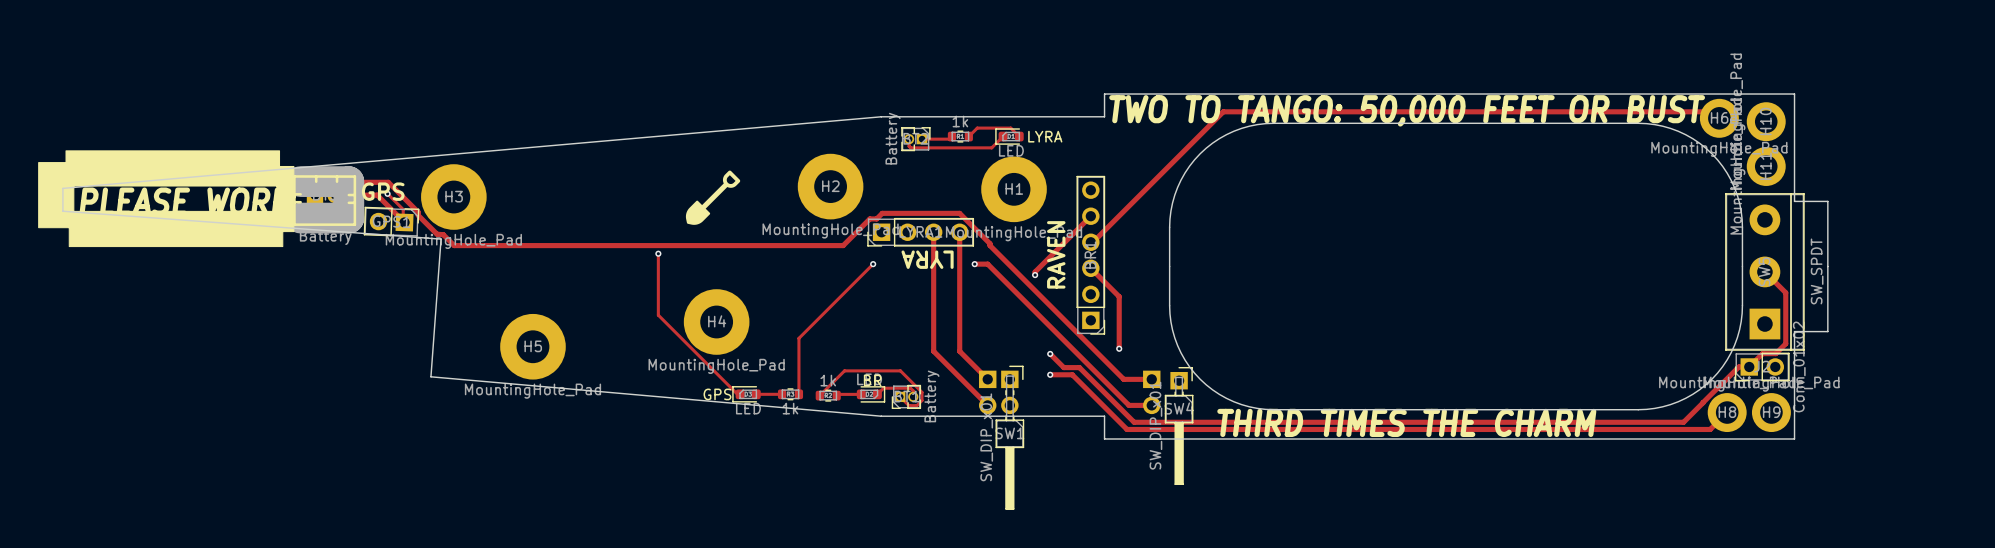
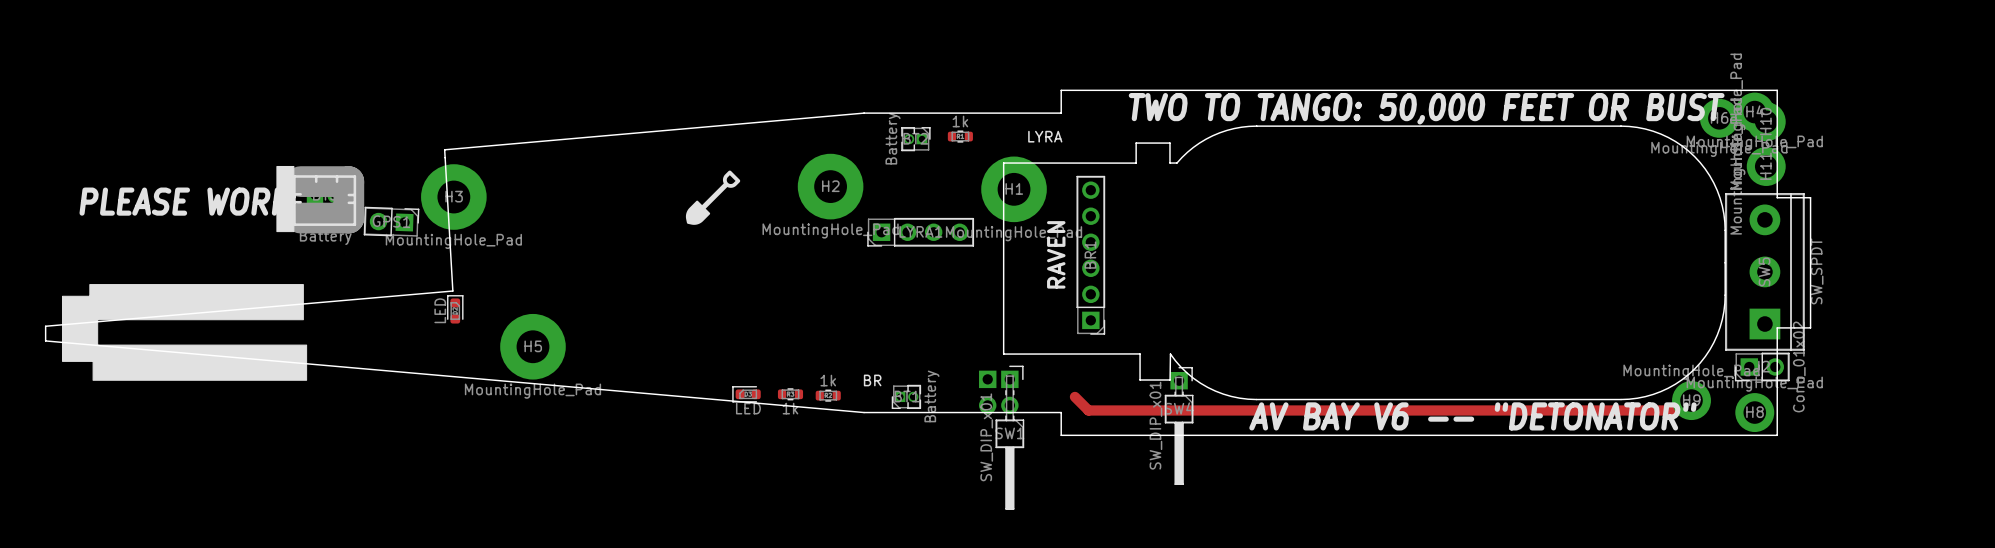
board edge: (1104, 94) (1104, 116) (881, 116) (62, 188) (62, 211) (441, 239) (430, 376) (881, 416) (1104, 416) (1104, 439) (1794, 439) (1794, 331) (1827, 331) (1827, 201) (1794, 201) (1794, 94) (1104, 94) -> (1061, 90) (1061, 113) (864, 113) (444, 149) (452, 291) (45, 326) (45, 340) (864, 412) (1061, 412) (1061, 435) (1777, 435) (1777, 327) (1810, 327) (1810, 197) (1777, 197) (1777, 90) (1061, 90)
text position: TWO TO TANGO: 50,000 FEET OR BUST (1407, 110) -> TWO TO TANGO: 50,000 FEET OR BUST (1426, 108)
track: (1719, 118) (1712, 111) (1223, 111) (1090, 242) -> none
board edge: (1273, 123) (1638, 123) (1662, 126) (1685, 134) (1699, 143) (1717, 159) (1731, 180) (1739, 203) (1742, 227) (1742, 313) (1739, 329) (1731, 352) (1717, 373) (1692, 394) (1670, 404) (1646, 409) (1273, 409) (1249, 406) (1226, 398) (1206, 384) (1194, 373) (1185, 360) (1174, 337) (1169, 305) (1170, 210) (1181, 180) (1194, 159) (1206, 148) (1233, 131) (1249, 126) (1273, 123) -> (1256, 126) (1234, 128) (1212, 135) (1193, 147) (1176, 163) (1169, 163) (1169, 143) (1136, 143) (1136, 163) (1003, 163) (1003, 354) (1140, 353) (1140, 379) (1170, 379) (1170, 354) (1187, 373) (1207, 387) (1223, 394) (1248, 399) (1621, 399) (1653, 394) (1675, 384) (1694, 368) (1713, 342) (1722, 319) (1724, 303) (1725, 230) (1722, 205) (1713, 183) (1700, 162) (1688, 151) (1668, 137) (1645, 129) (1621, 126) (1256, 126)
track: (951, 136) (949, 139) (922, 139) -> none
track: (968, 136) (977, 128) (1010, 128) (1019, 136) -> none
track: (1003, 136) (991, 147) (910, 147) (909, 139) -> none
part: LED (1009, 136) -> none
drawing: [65, 150, 281, 187] -> none
text: GPS (383, 191) -> none
track: (387, 193) (403, 209) (404, 222) (377, 195) (335, 195) -> none
via: (387, 193) -> none
drawing position: (56, 195) -> (80, 328)
track: (314, 195) (327, 182) (388, 182) (437, 234) (443, 234) (454, 245) (843, 245) (869, 218) (876, 218) (882, 213) (959, 213) (1123, 379) (1151, 379) -> none
drawing: [68, 210, 284, 248] -> none
track: (1090, 216) (1035, 271) (1035, 275) -> none
track: (933, 232) (933, 351) (987, 405) -> none
track: (959, 232) (959, 351) (987, 379) -> none
track: (658, 253) (658, 315) (737, 394) (740, 394) -> none
via: (658, 253) -> none
text: LYRA (927, 259) -> none
track: (873, 264) (798, 338) (798, 394) -> none
via: (873, 264) -> none
track: (974, 264) (987, 264) (1128, 405) (1151, 405) -> none
via: (974, 264) -> none
track: (1090, 268) (1119, 296) (1119, 348) -> none
track: (1764, 271) (1785, 292) (1785, 343) (1775, 353) (1762, 353) (1749, 366) (1738, 366) (1683, 422) (1134, 422) (1079, 367) (1063, 367) (1050, 353) -> none
via: (1035, 275) -> none
drawing: none -> [89, 284, 304, 321]
H4 footprint: [683, 289, 750, 355] -> [1735, 92, 1775, 132]
drawing: none -> [92, 344, 308, 381]
via: (1119, 348) -> none
via: (1050, 353) -> none
track: (1050, 374) (1072, 374) (1127, 429) (1710, 429) (1727, 412) -> none
via: (1050, 374) -> none
part: (1151, 392) -> none
text: GPS (717, 394) -> none
track: (756, 394) (782, 394) -> none
track: (861, 394) (836, 395) -> none
part rotation: 0° (870, 394) -> 90° counterclockwise (455, 309)
part position: (870, 394) -> (455, 309)
track: (877, 394) (883, 388) (910, 388) (913, 390) (913, 396) -> none
track: (819, 395) (844, 370) (900, 370) (921, 392) (921, 400) (916, 405) (908, 405) (900, 396) -> none
track: none -> (1074, 396) (1088, 410) (1681, 410) (1691, 400)
H8 position: (1727, 412) -> (1754, 412)
H9 position: (1771, 412) -> (1691, 400)
text: none -> AV BAY V6 -- "DETONATOR" (1472, 416)
text: THIRD TIMES THE CHARM (1406, 422) -> none

